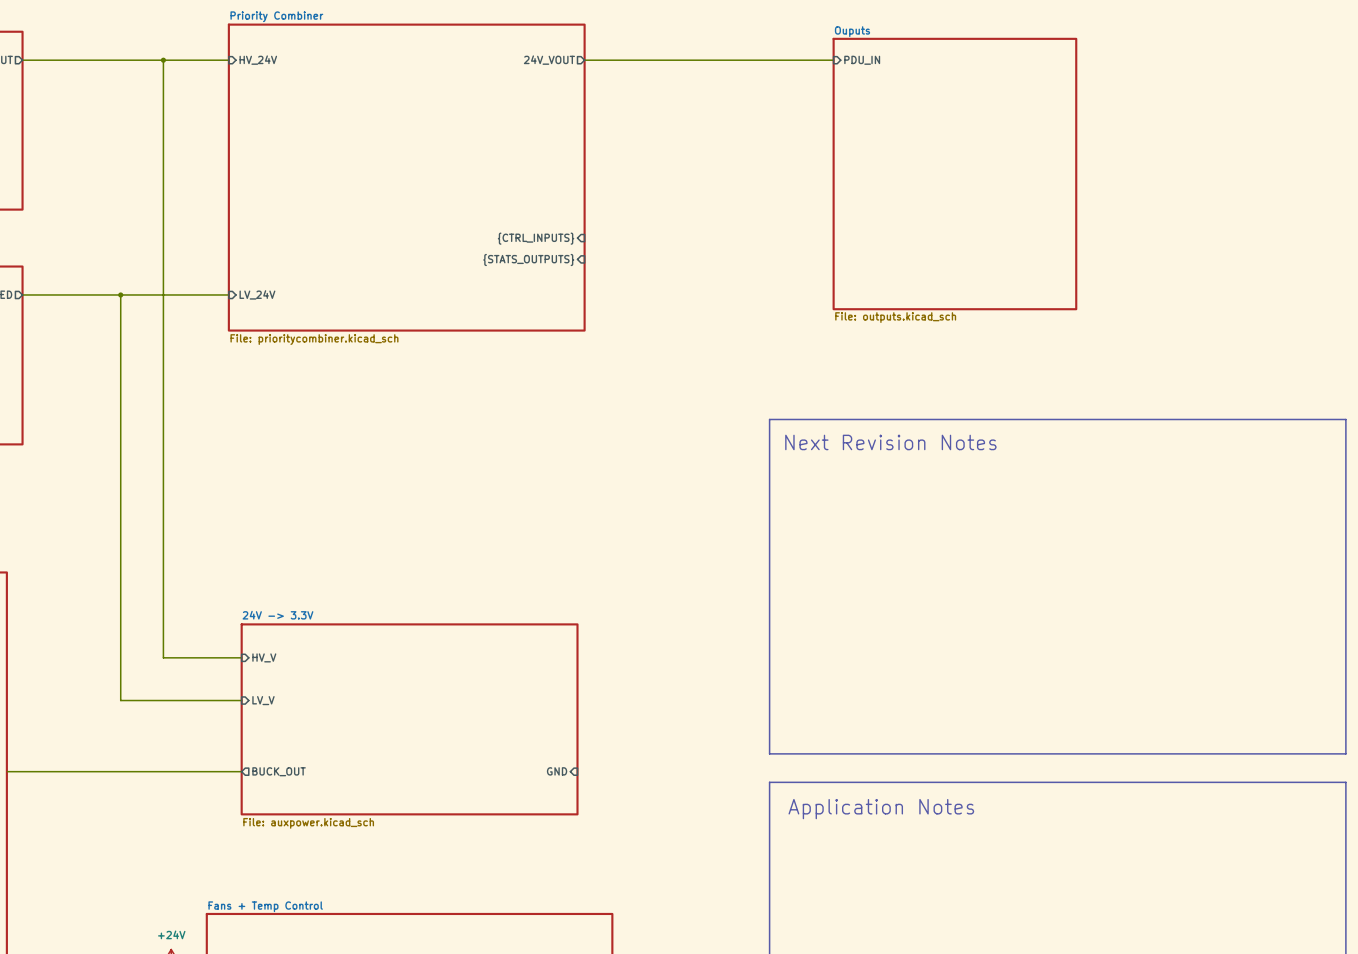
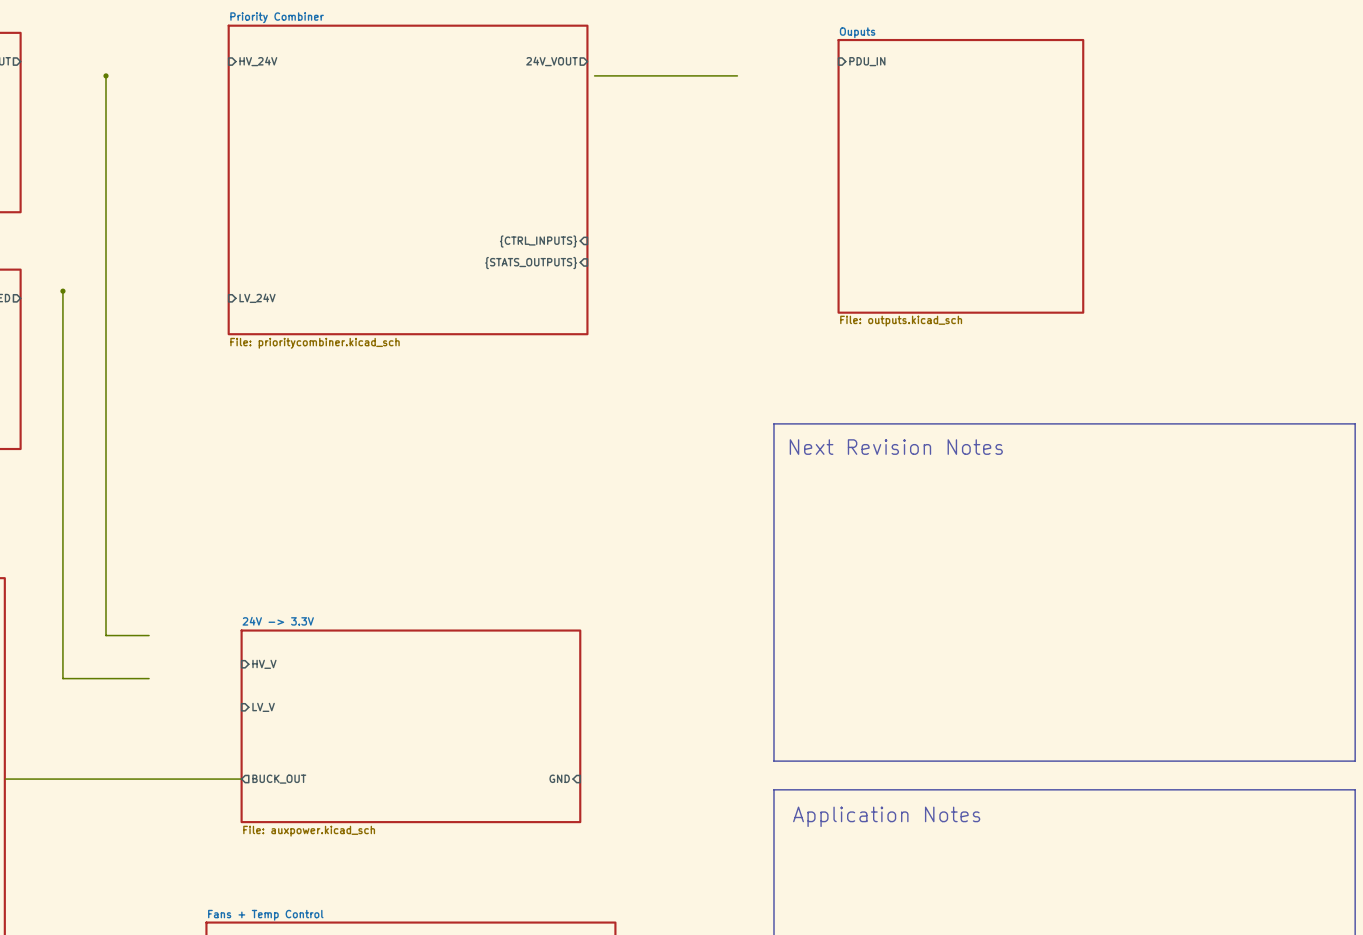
wire: (22, 60) (228, 60) -> none
wire: (163, 60) (163, 657) (241, 657) -> none
junction: (163, 60) -> none
wire: (584, 60) (833, 60) -> none
wire: none -> (106, 75) (106, 635) (149, 635)
junction: none -> (106, 75)
wire: none -> (594, 75) (737, 75)
wire: none -> (62, 291) (62, 678) (149, 678)
junction: none -> (62, 291)
wire: (22, 294) (228, 294) -> none
wire: (120, 294) (120, 700) (241, 700) -> none
junction: (120, 294) -> none

